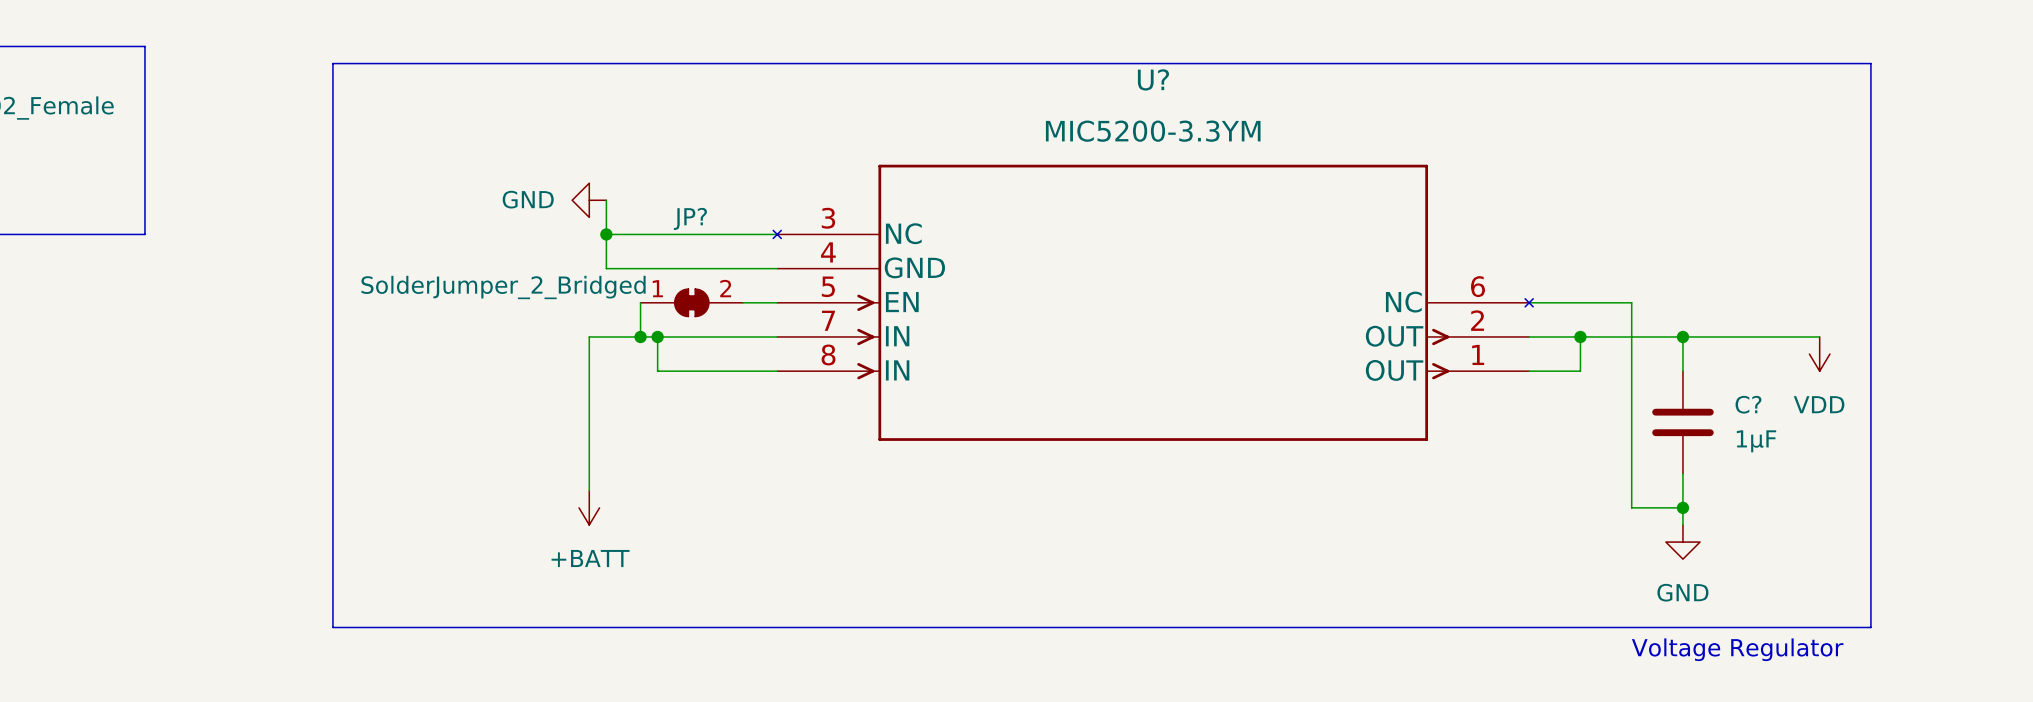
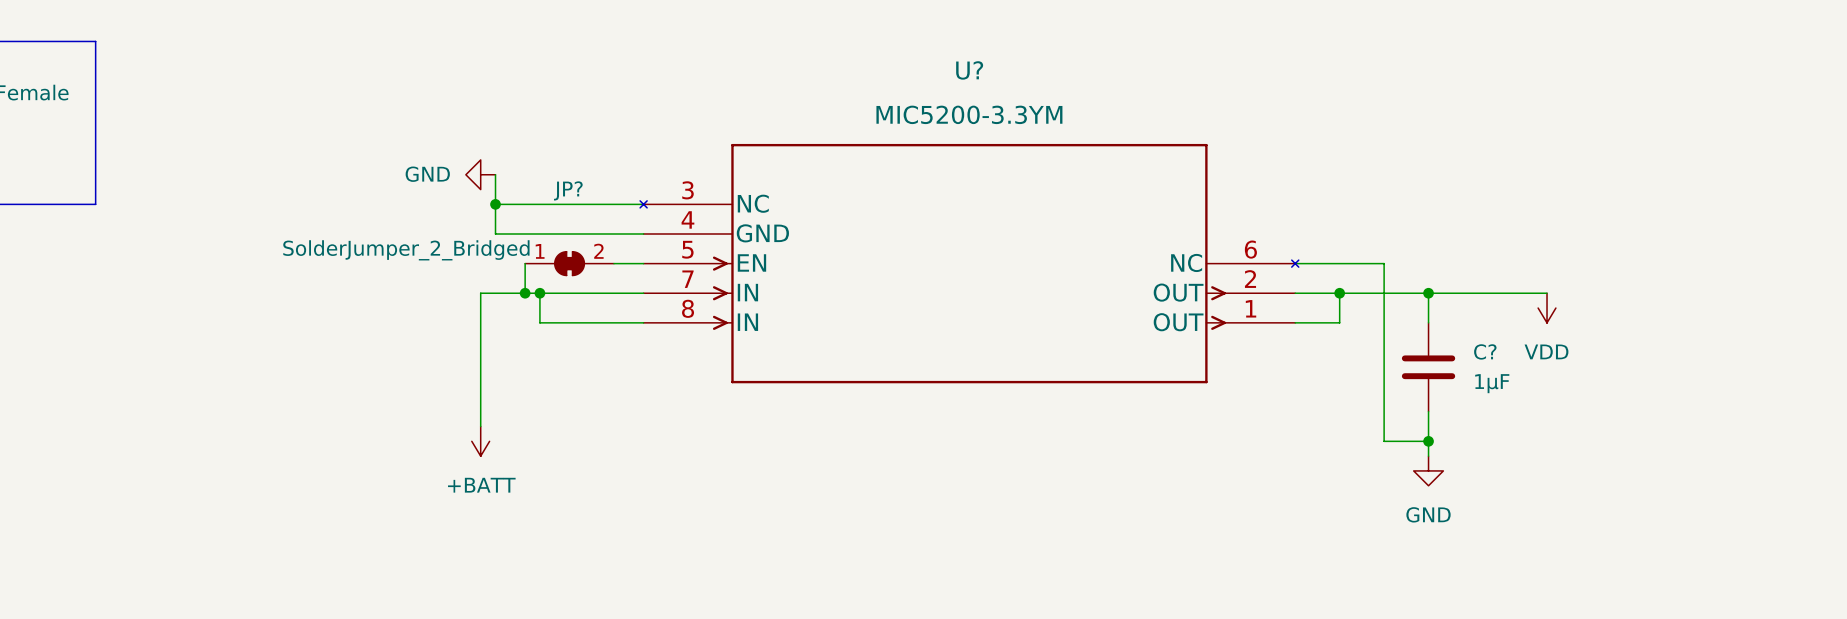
line: (332, 63) (1870, 63) (1870, 627) (332, 627) (332, 63) -> none
text: Voltage Regulator (1737, 649) -> none

